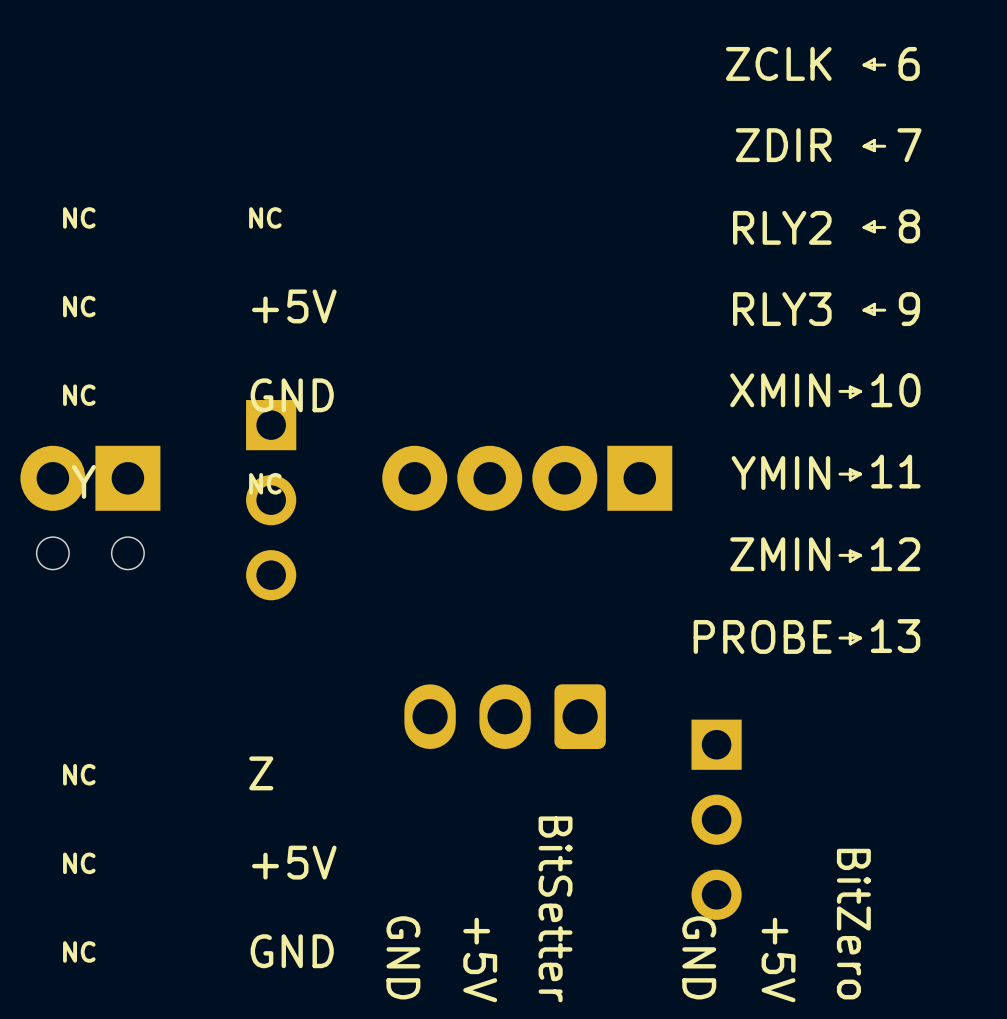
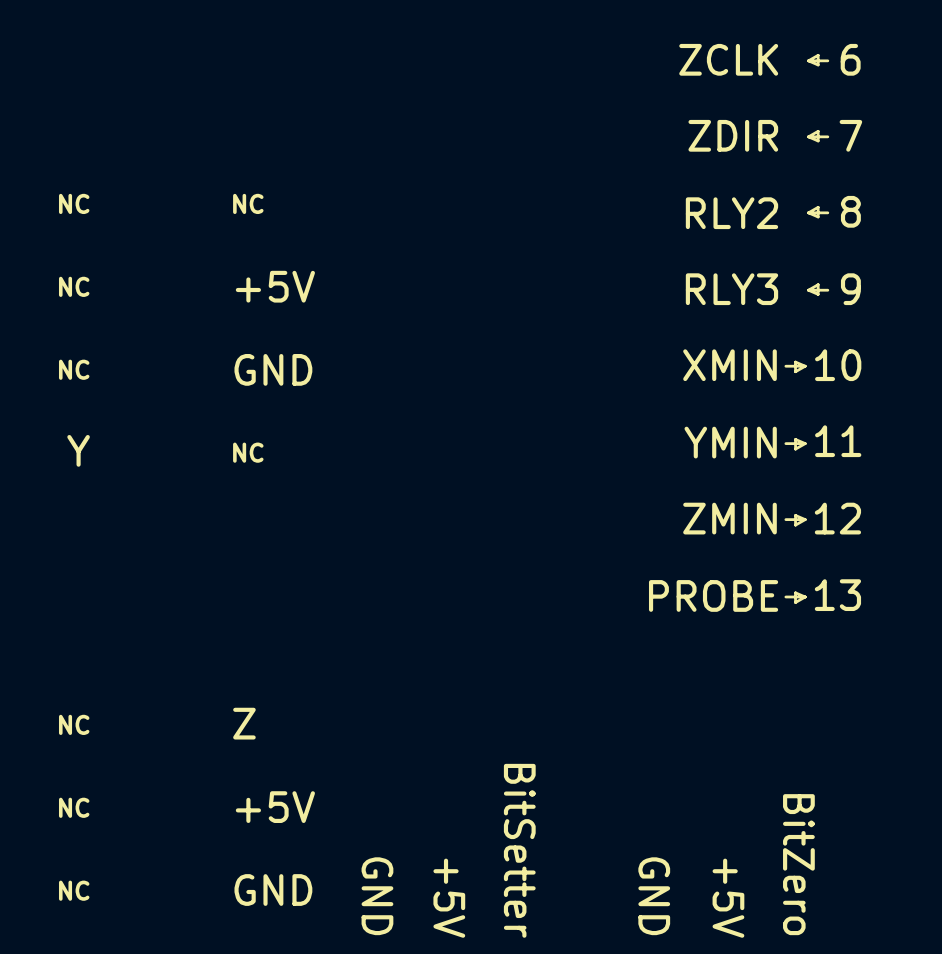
part: (527, 478) -> none
part: (271, 500) -> none
part: (90, 507) -> none
part: (505, 716) -> none
part: (716, 819) -> none

